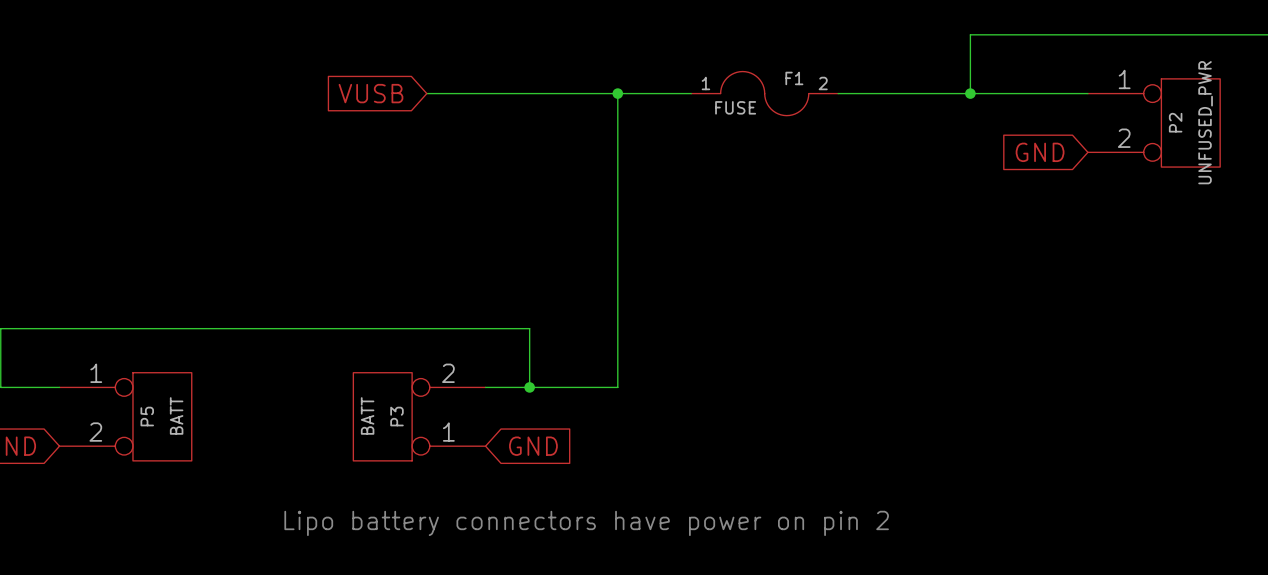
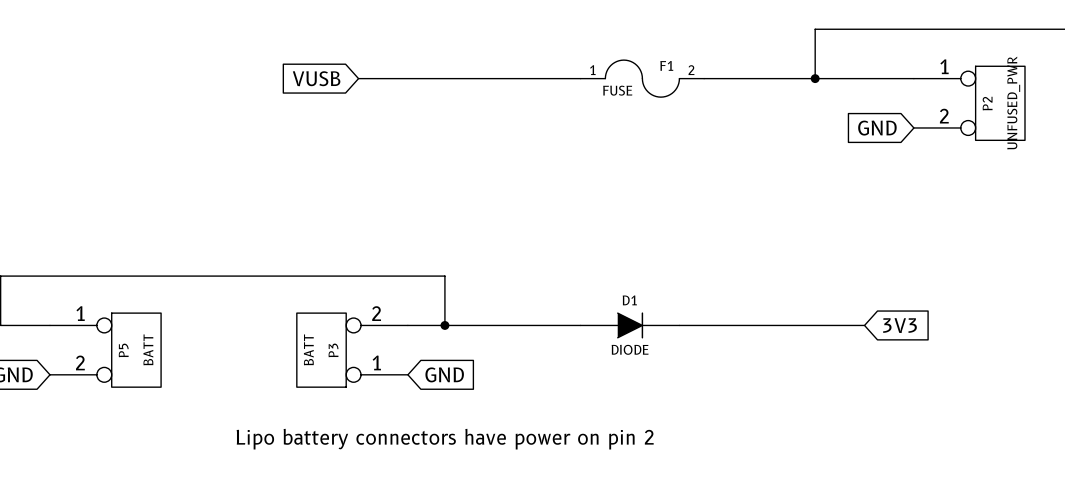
wire: (617, 93) (617, 387) -> (580, 325) (518, 325)
junction: (617, 93) -> none
D1: none -> DIODE (630, 325)
wire: none -> (679, 325) (864, 325)
global label: none -> 3V3 (900, 325)

